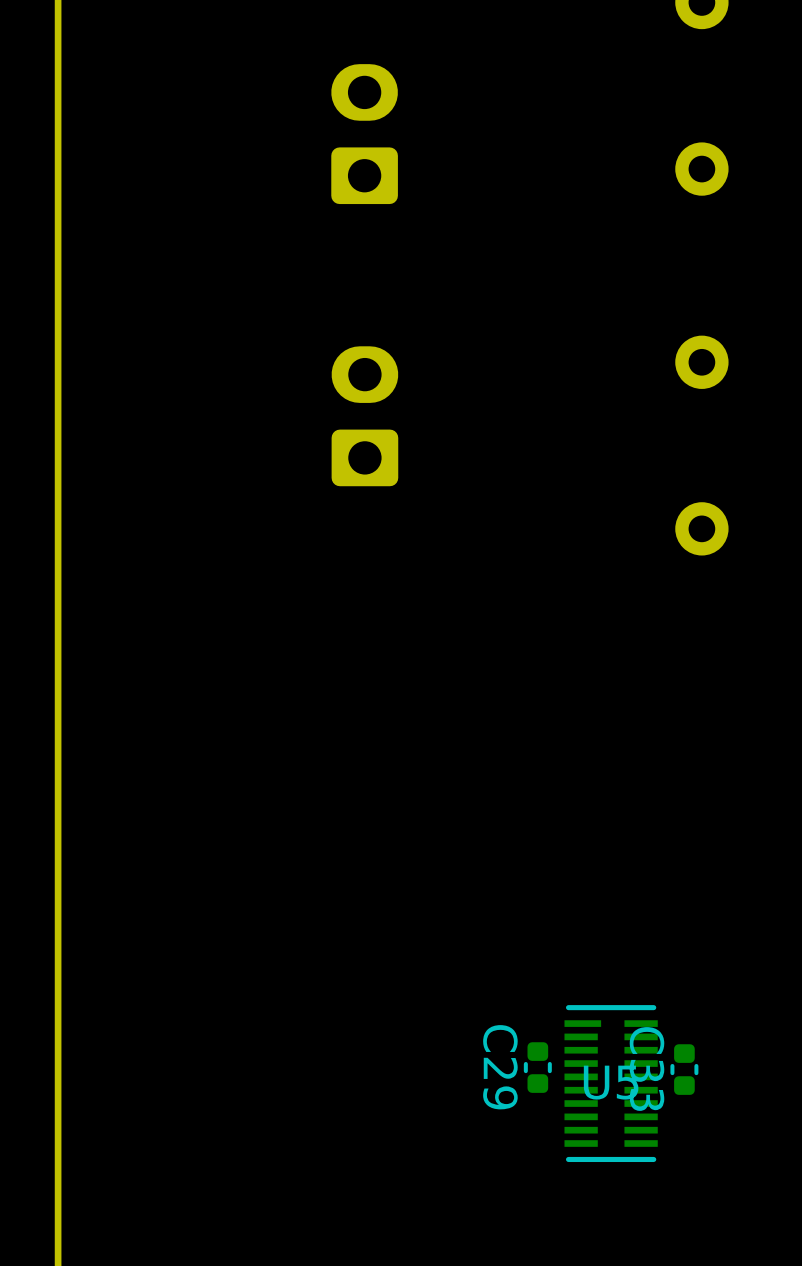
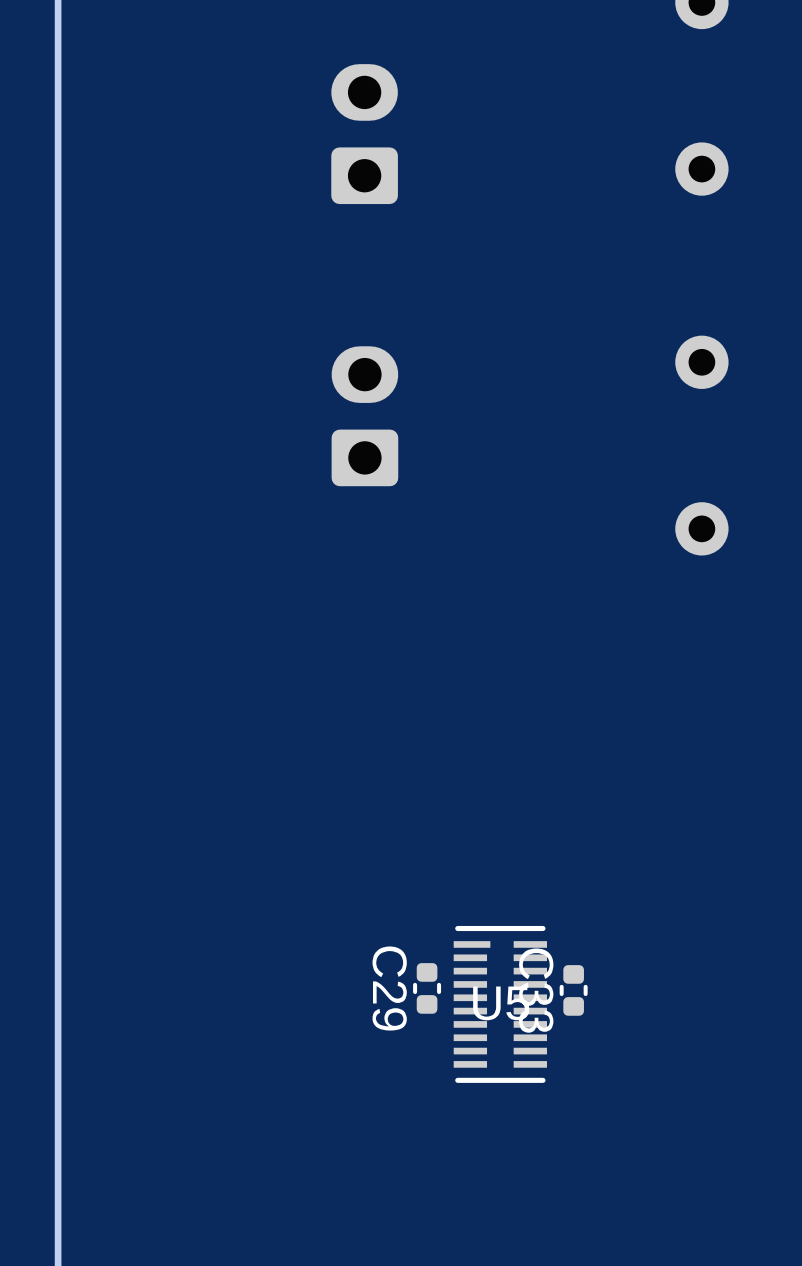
C29 position: (537, 1067) -> (427, 988)
C33 position: (684, 1069) -> (573, 990)
U5 position: (611, 1083) -> (500, 1004)

